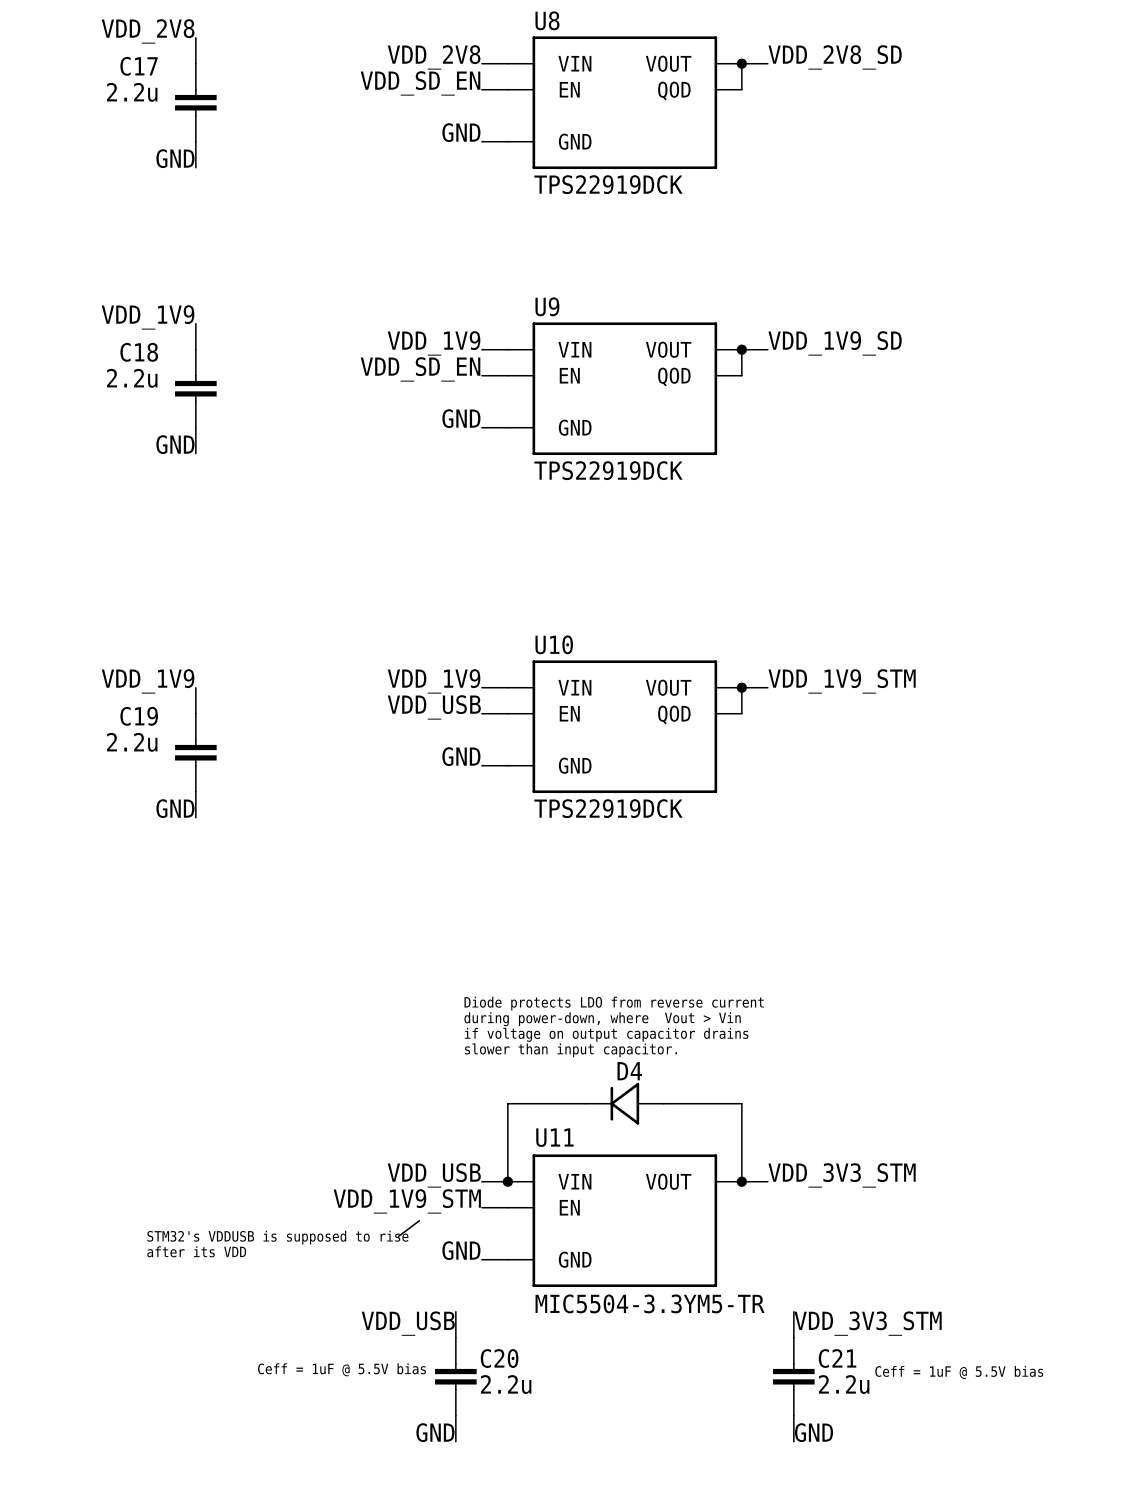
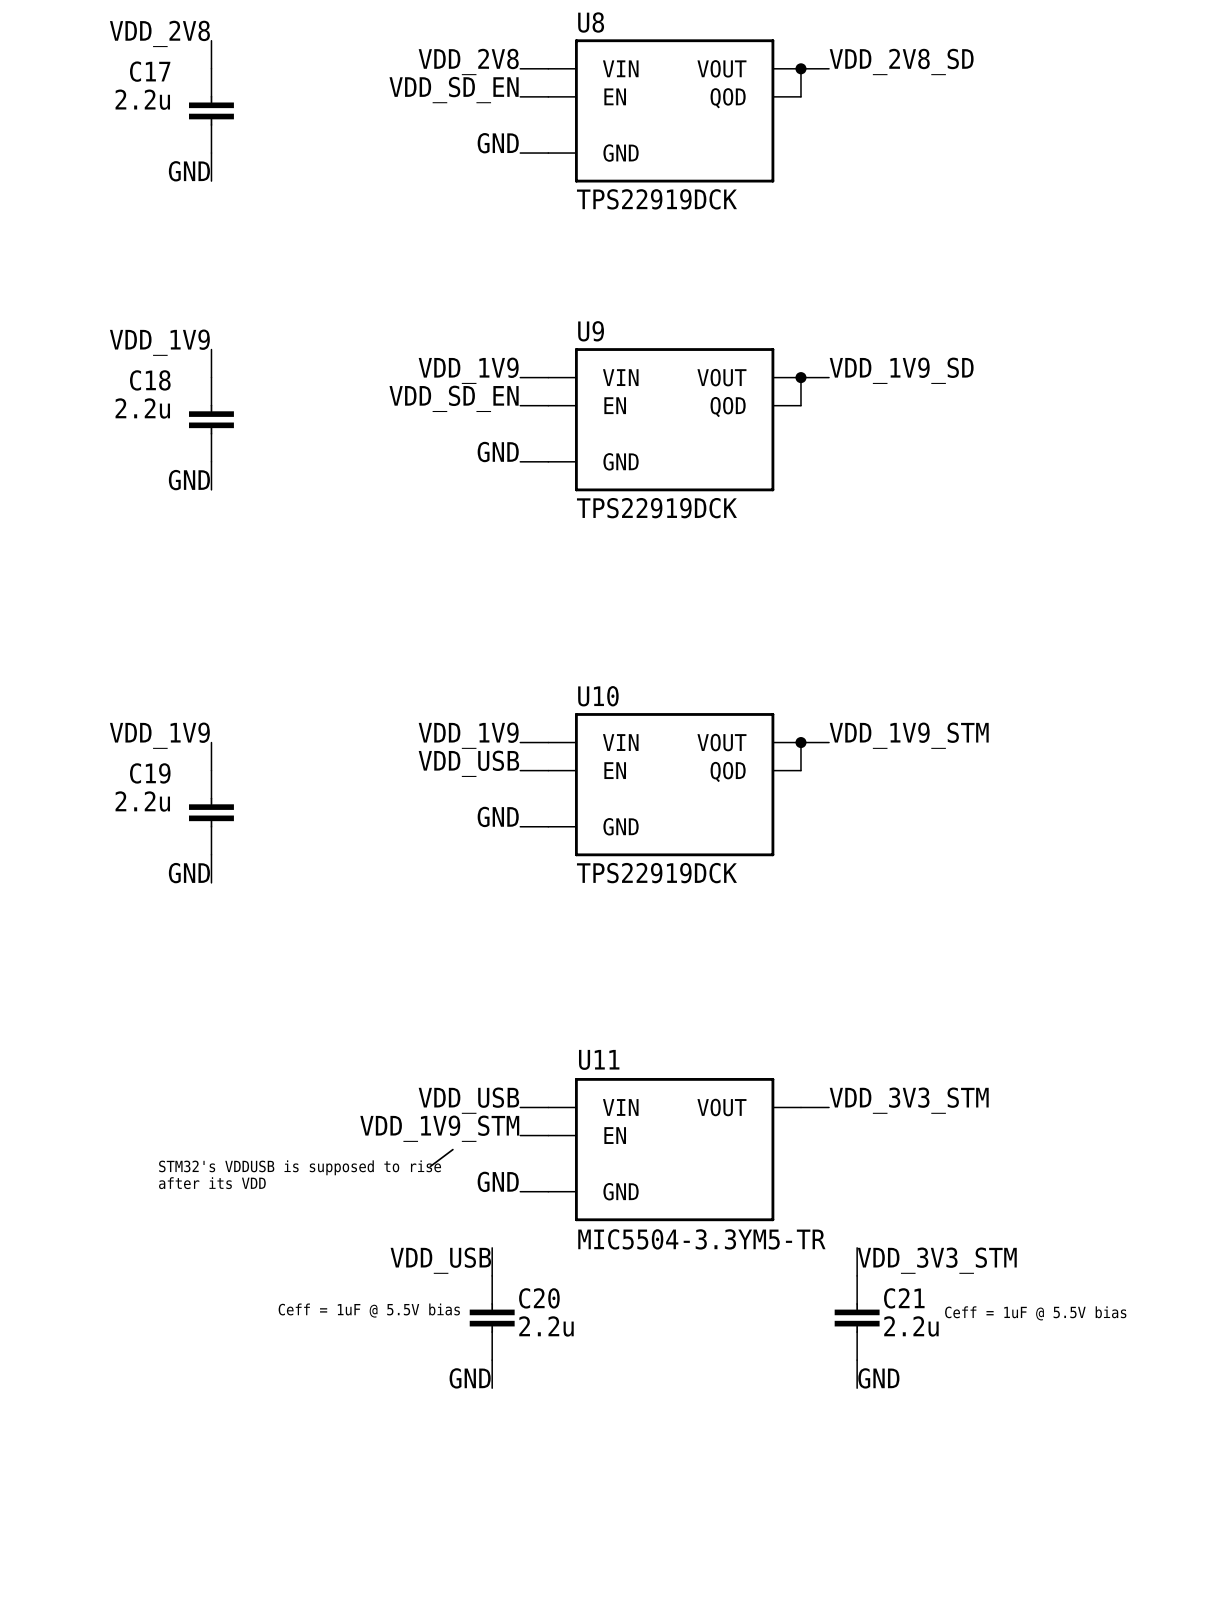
text: Diode protects LDO from reverse current (614, 1003) -> none
label: none -> VDD_USB (468, 1100)
text: during power-down, where Vout > Vin (602, 1019) -> none
label: none -> VDD_3V3_STM (909, 1100)
wire: none -> (520, 1107) (548, 1107)
wire: none -> (800, 1107) (829, 1107)
text: if voltage on output capacitor drains (606, 1034) -> none
text: slower than input capacitor. (570, 1050) -> none
label: none -> GND (498, 1181)
wire: (585, 1103) (507, 1103) (507, 1181) (481, 1181) -> none
D4: (624, 1103) -> none
wire: (663, 1103) (741, 1103) (741, 1181) (767, 1181) -> none
label position: VDD_USB (434, 1175) -> VDD_USB (440, 1260)
label position: VDD_3V3_STM (842, 1175) -> VDD_3V3_STM (937, 1260)
junction: (507, 1181) -> none
junction: (741, 1181) -> none
label position: VDD_1V9_STM (407, 1201) -> VDD_1V9_STM (439, 1128)
wire: (481, 1207) (507, 1207) -> (520, 1135) (548, 1135)
line: (419, 1220) (398, 1236) -> (452, 1149) (430, 1166)
U11 position: (624, 1220) -> (674, 1149)
text position: STM32's VDDUSB is supposed to rise (277, 1237) -> STM32's VDDUSB is supposed to rise (300, 1167)
label position: GND (461, 1250) -> GND (470, 1378)
text position: after its VDD (196, 1251) -> after its VDD (212, 1183)
wire: (481, 1259) (507, 1259) -> (520, 1191) (548, 1191)
wire: (455, 1311) (455, 1337) -> (492, 1247) (492, 1275)
wire: (793, 1311) (793, 1337) -> (857, 1247) (857, 1275)
label: VDD_USB (408, 1323) -> none
label: VDD_3V3_STM (868, 1323) -> none
text position: Ceff = 1uF @ 5.5V bias (342, 1369) -> Ceff = 1uF @ 5.5V bias (369, 1310)
text position: Ceff = 1uF @ 5.5V bias (959, 1372) -> Ceff = 1uF @ 5.5V bias (1035, 1313)
C20 position: (455, 1376) -> (492, 1318)
C21 position: (793, 1376) -> (857, 1318)
wire: (455, 1415) (455, 1441) -> (492, 1360) (492, 1388)
wire: (793, 1415) (793, 1441) -> (857, 1360) (857, 1388)
label: GND (435, 1432) -> none
label position: GND (814, 1432) -> GND (878, 1378)

